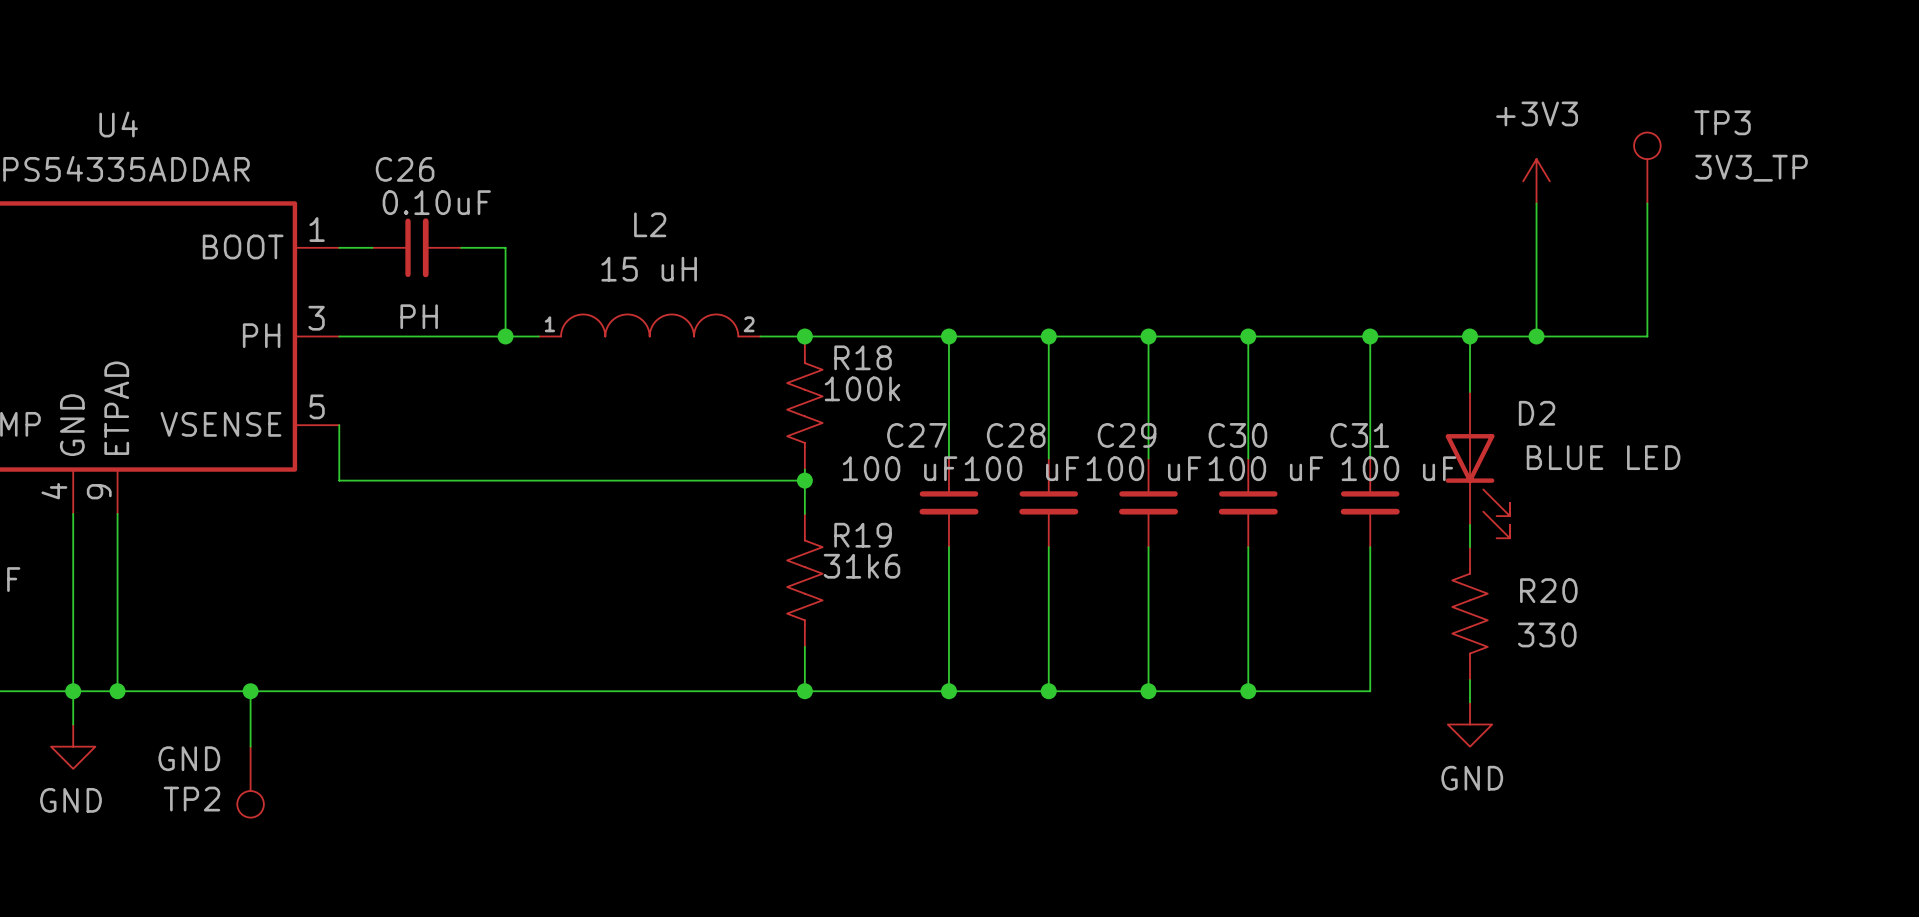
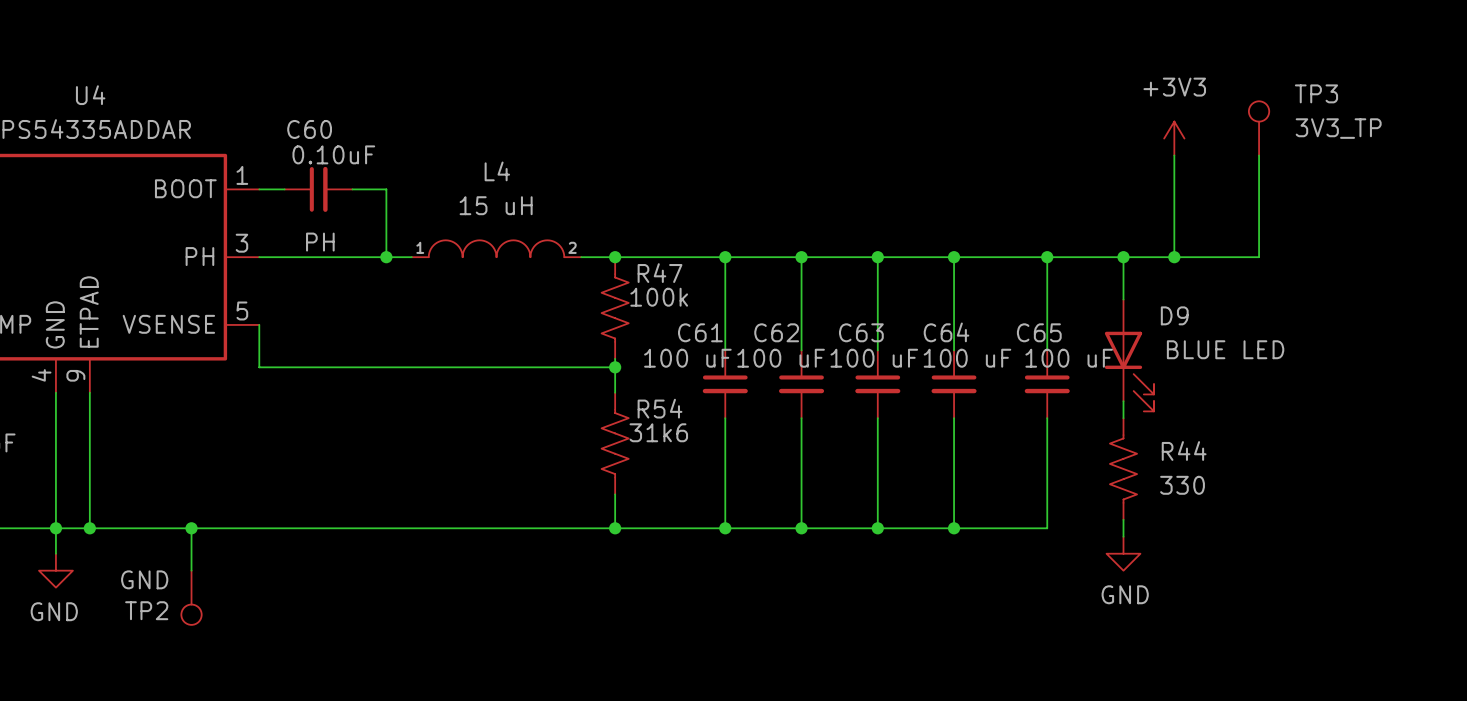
C26 name: C26 (405, 169) -> C60 (309, 129)
L2 name: L2 (650, 224) -> L4 (497, 171)
R18 name: R18 (863, 357) -> R47 (660, 273)
D2 name: D2 (1537, 413) -> D9 (1174, 315)
C27 name: C27 (916, 435) -> C61 (700, 332)
C28 name: C28 (1016, 435) -> C62 (776, 332)
C29 name: C29 (1127, 435) -> C63 (861, 332)
C30 name: C30 (1237, 435) -> C64 (946, 332)
C31 name: C31 (1359, 435) -> C65 (1039, 332)
R19 name: R19 (863, 535) -> R54 (660, 408)
R20 name: R20 (1548, 590) -> R44 (1184, 451)

